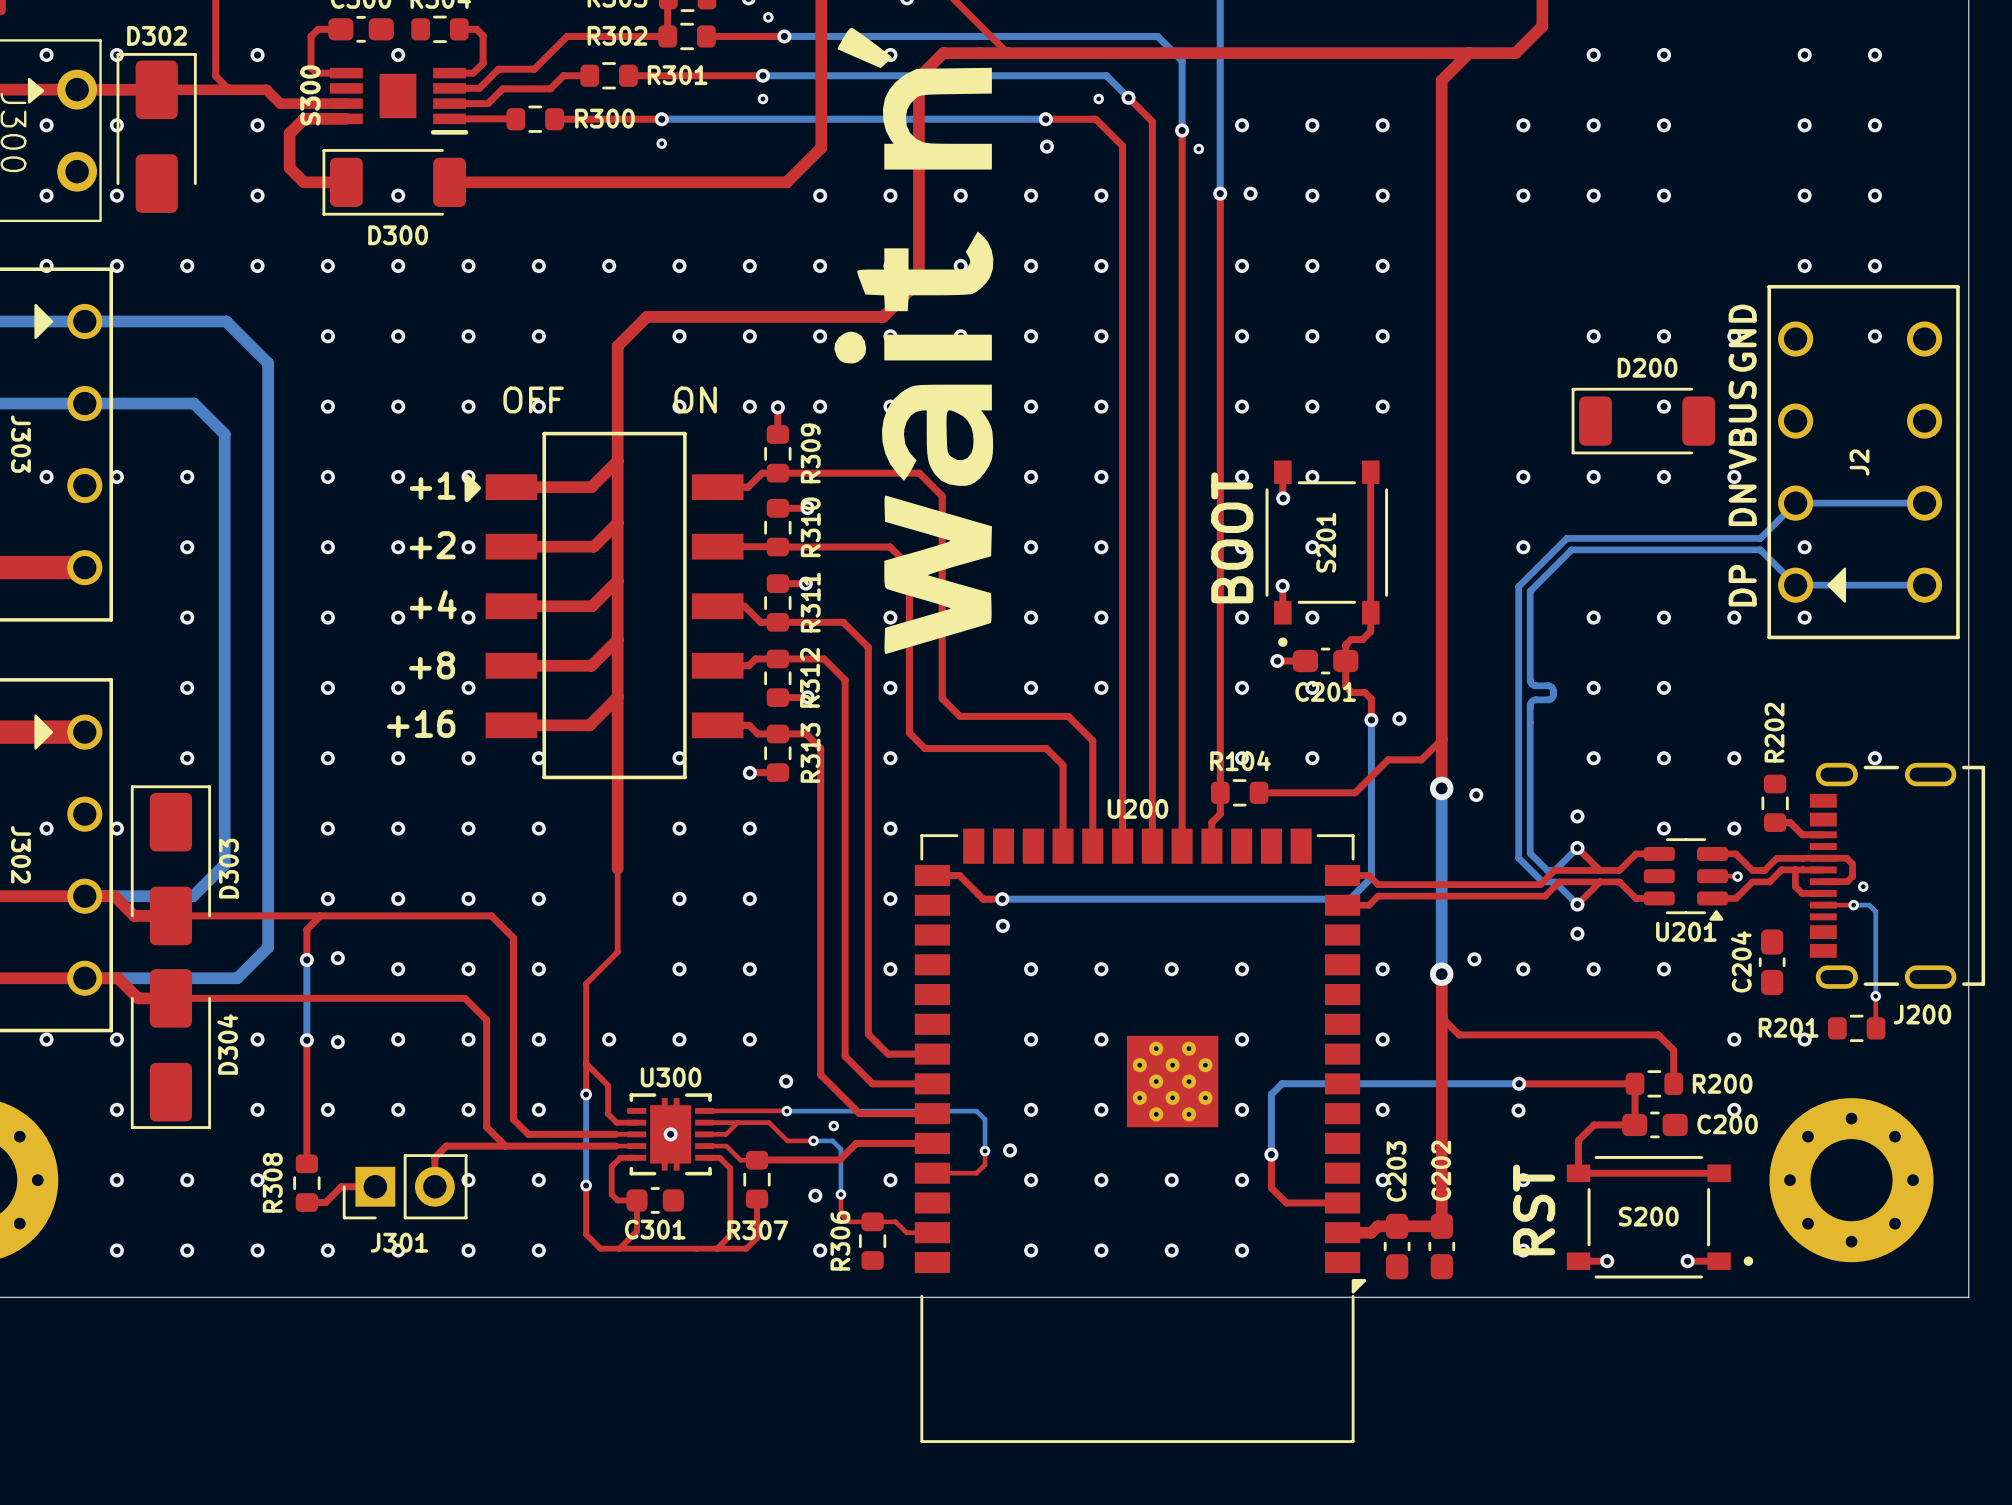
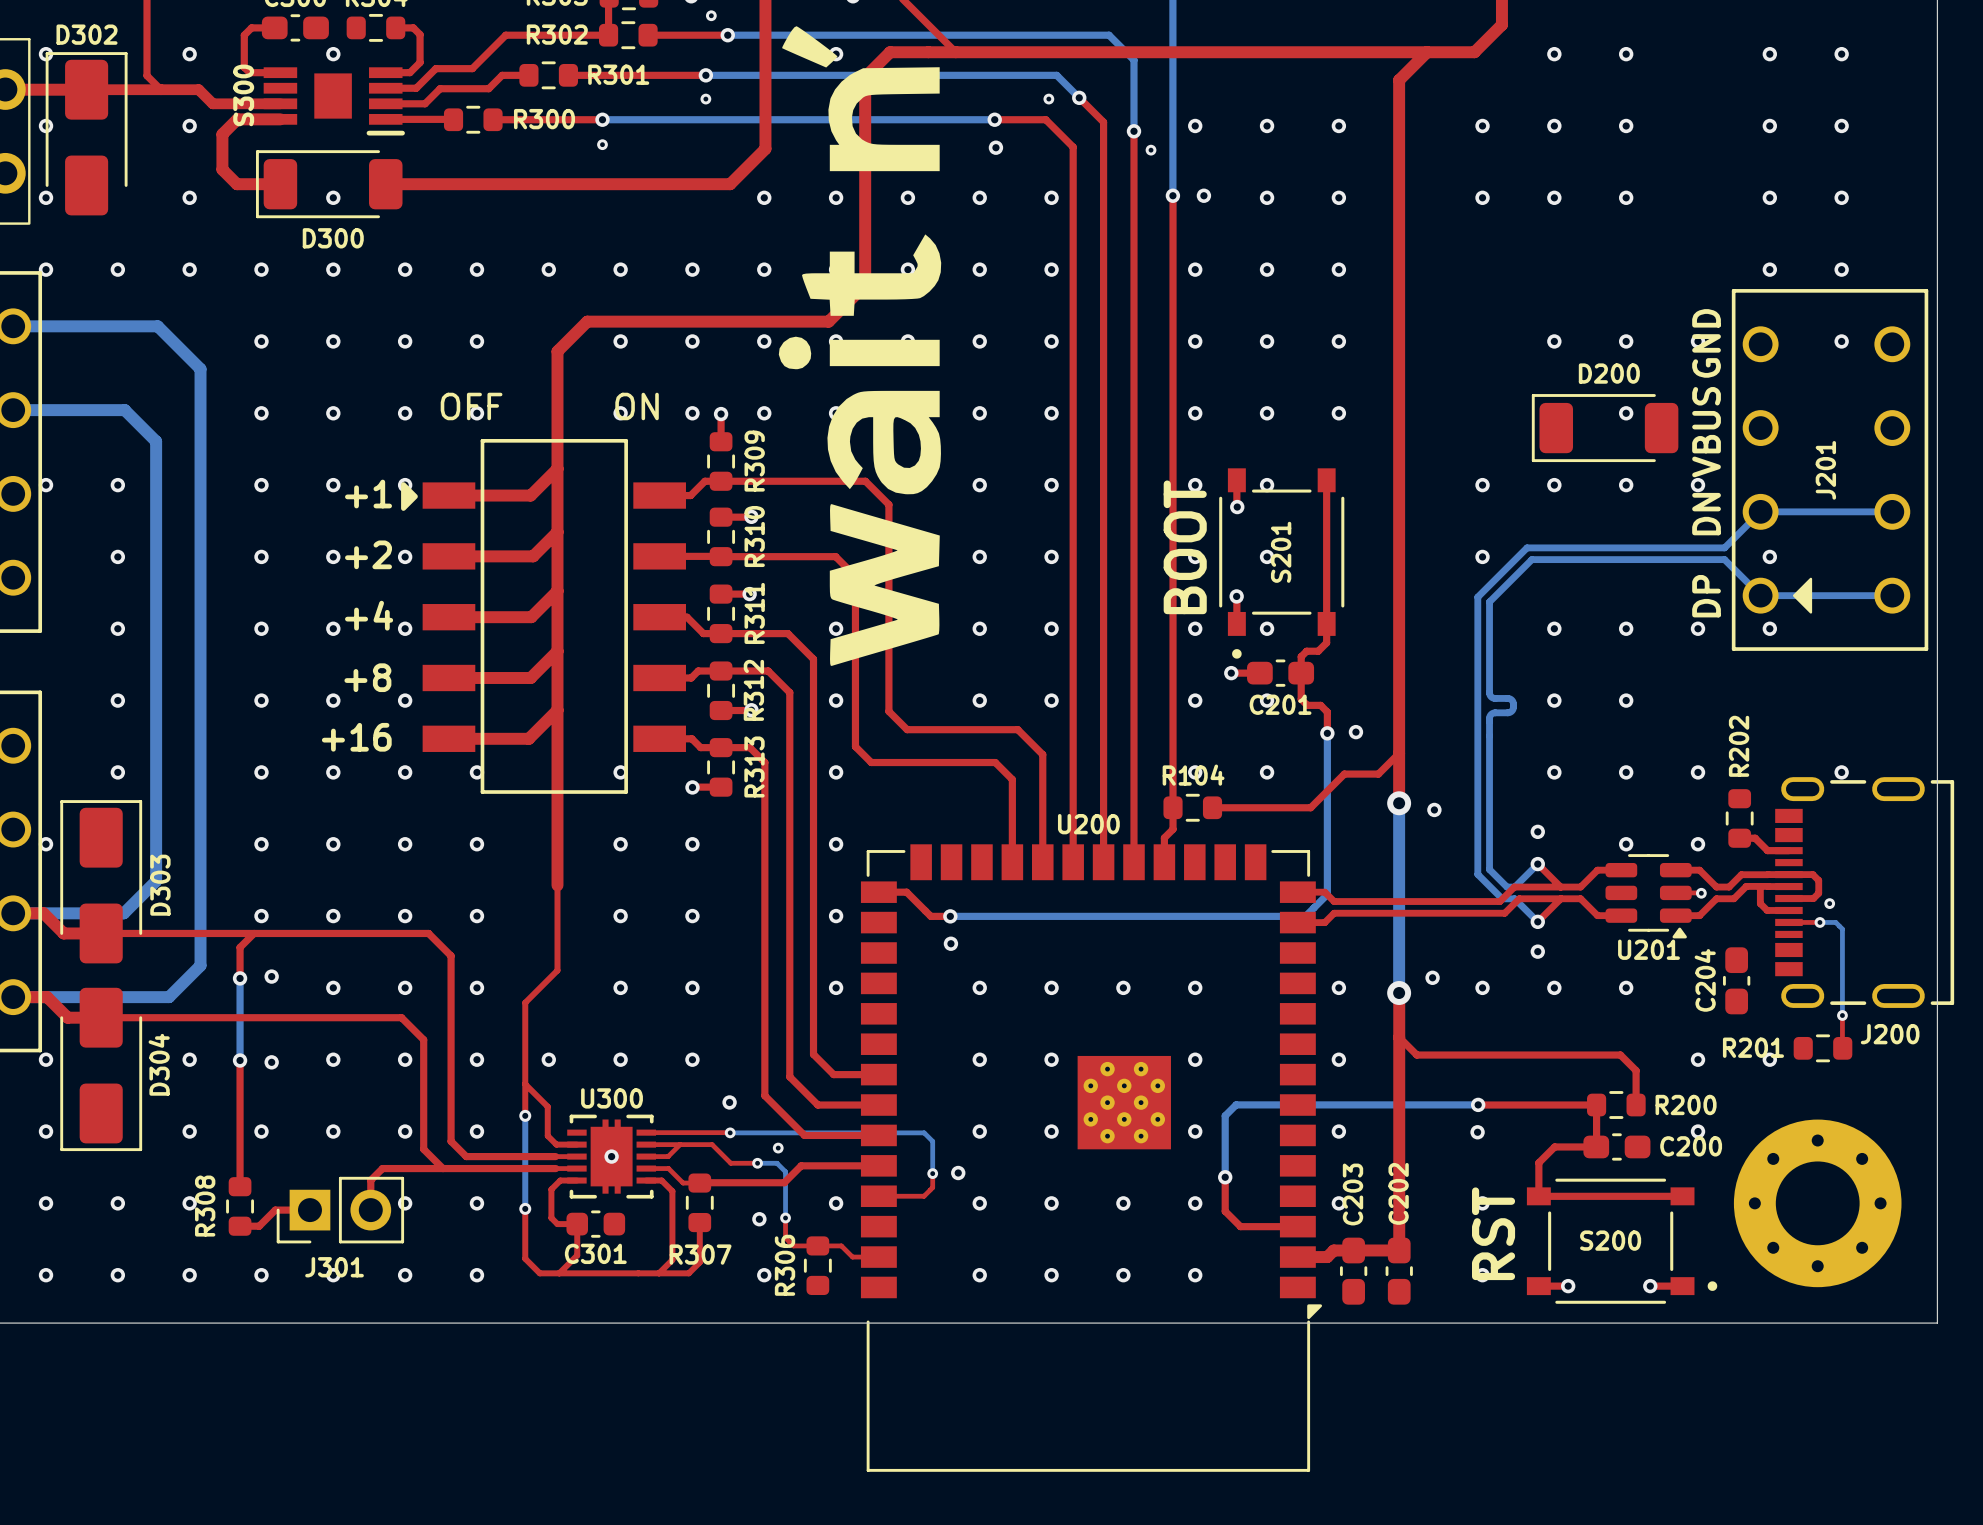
J2 name: J2 (1859, 462) -> J201 (1825, 470)

